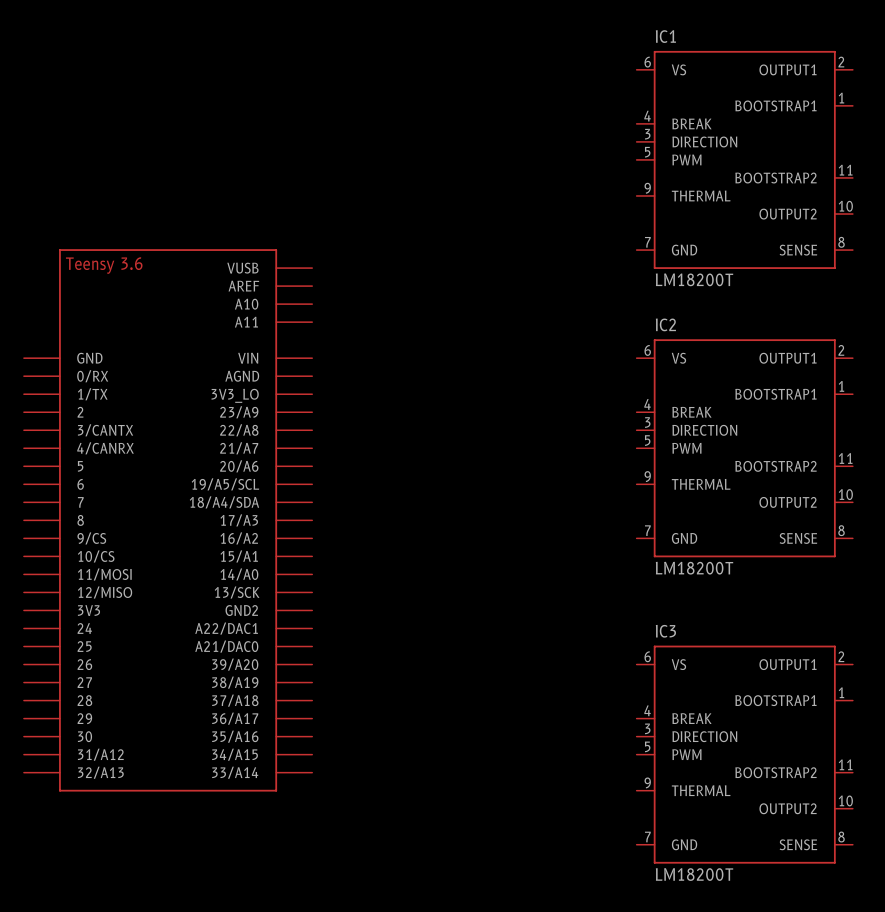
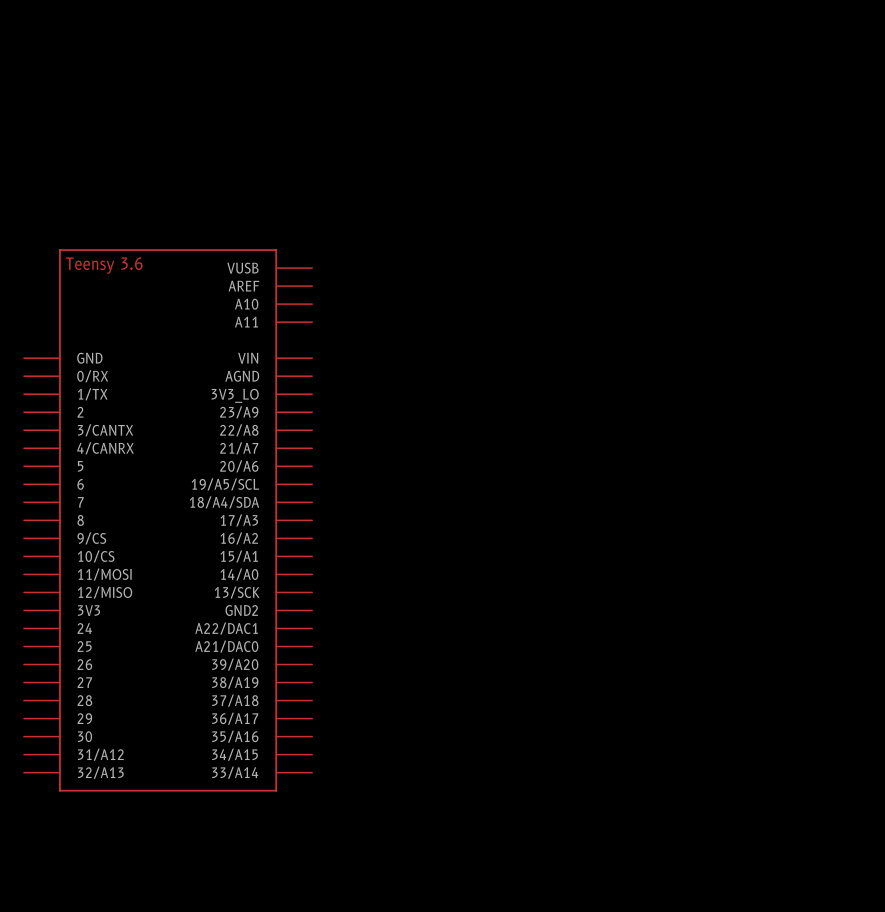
IC1: LM18200T (744, 159) -> none
IC2: LM18200T (744, 448) -> none
IC3: LM18200T (744, 754) -> none

